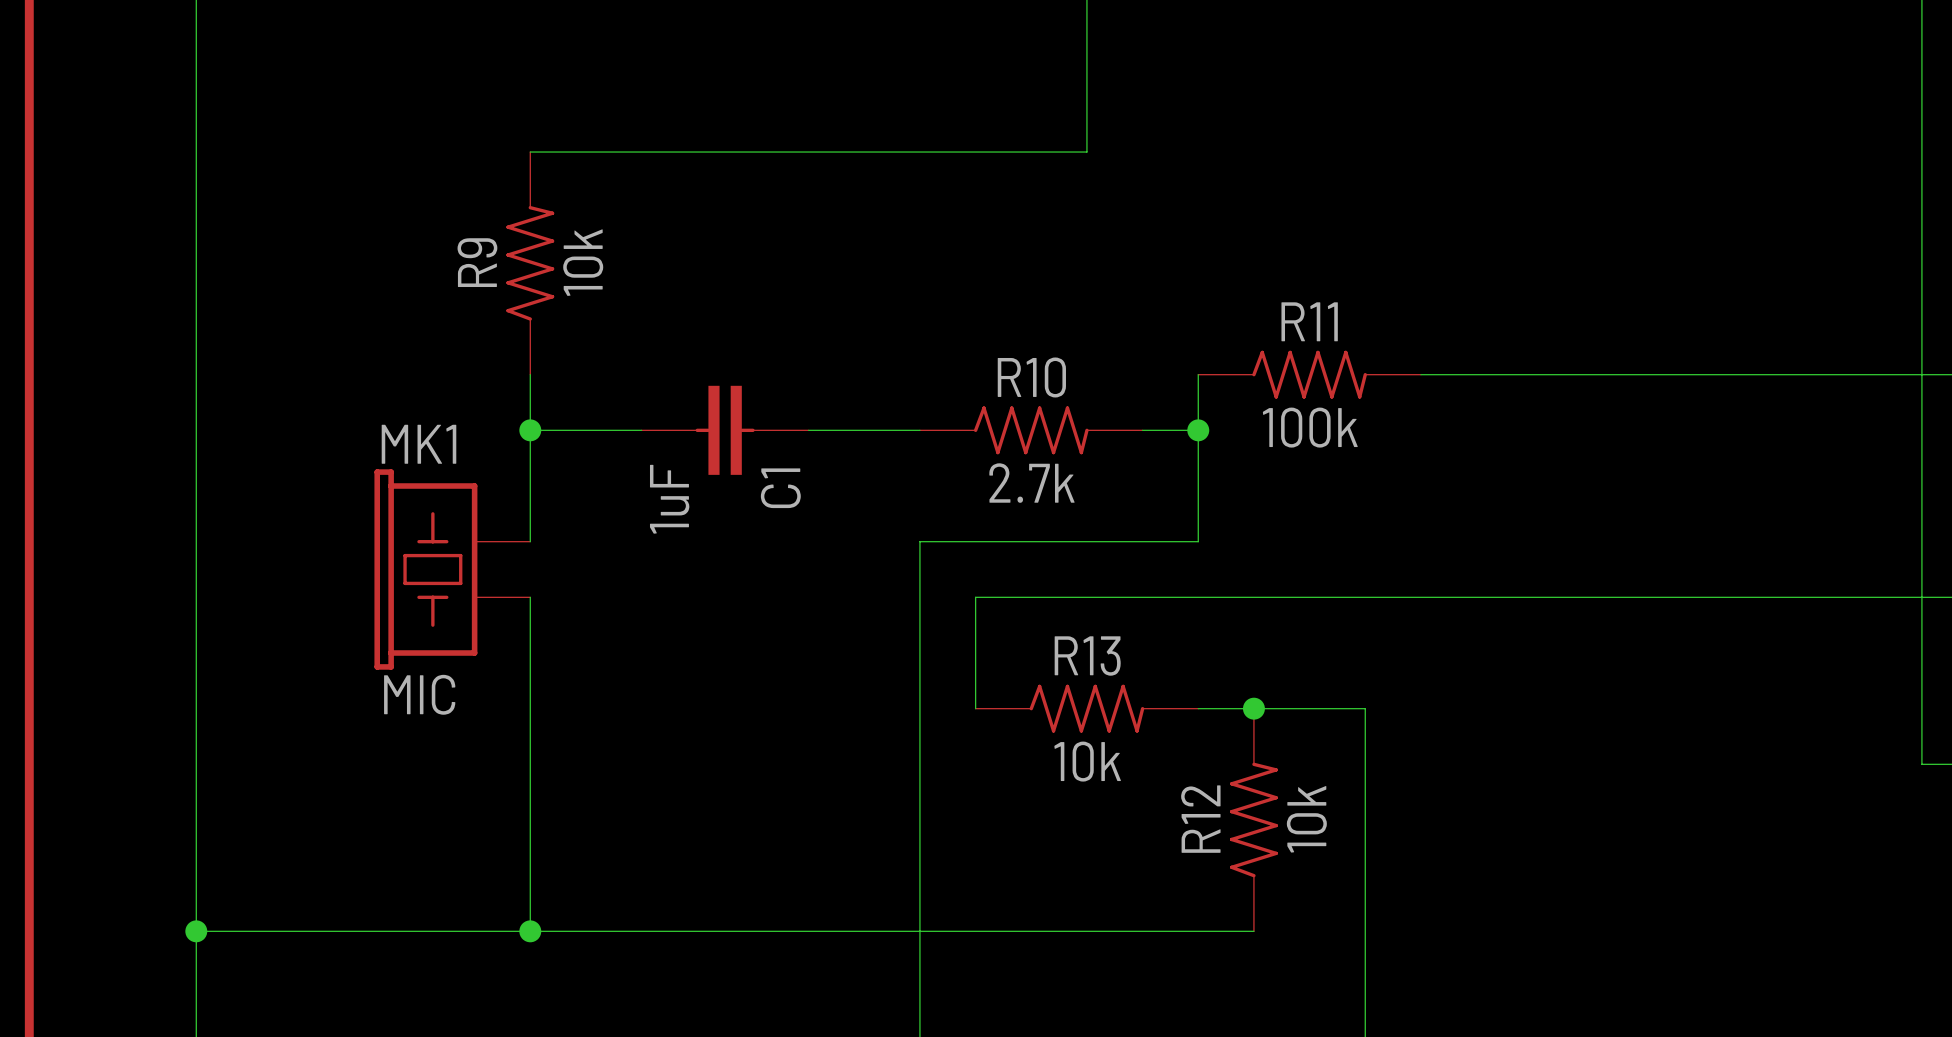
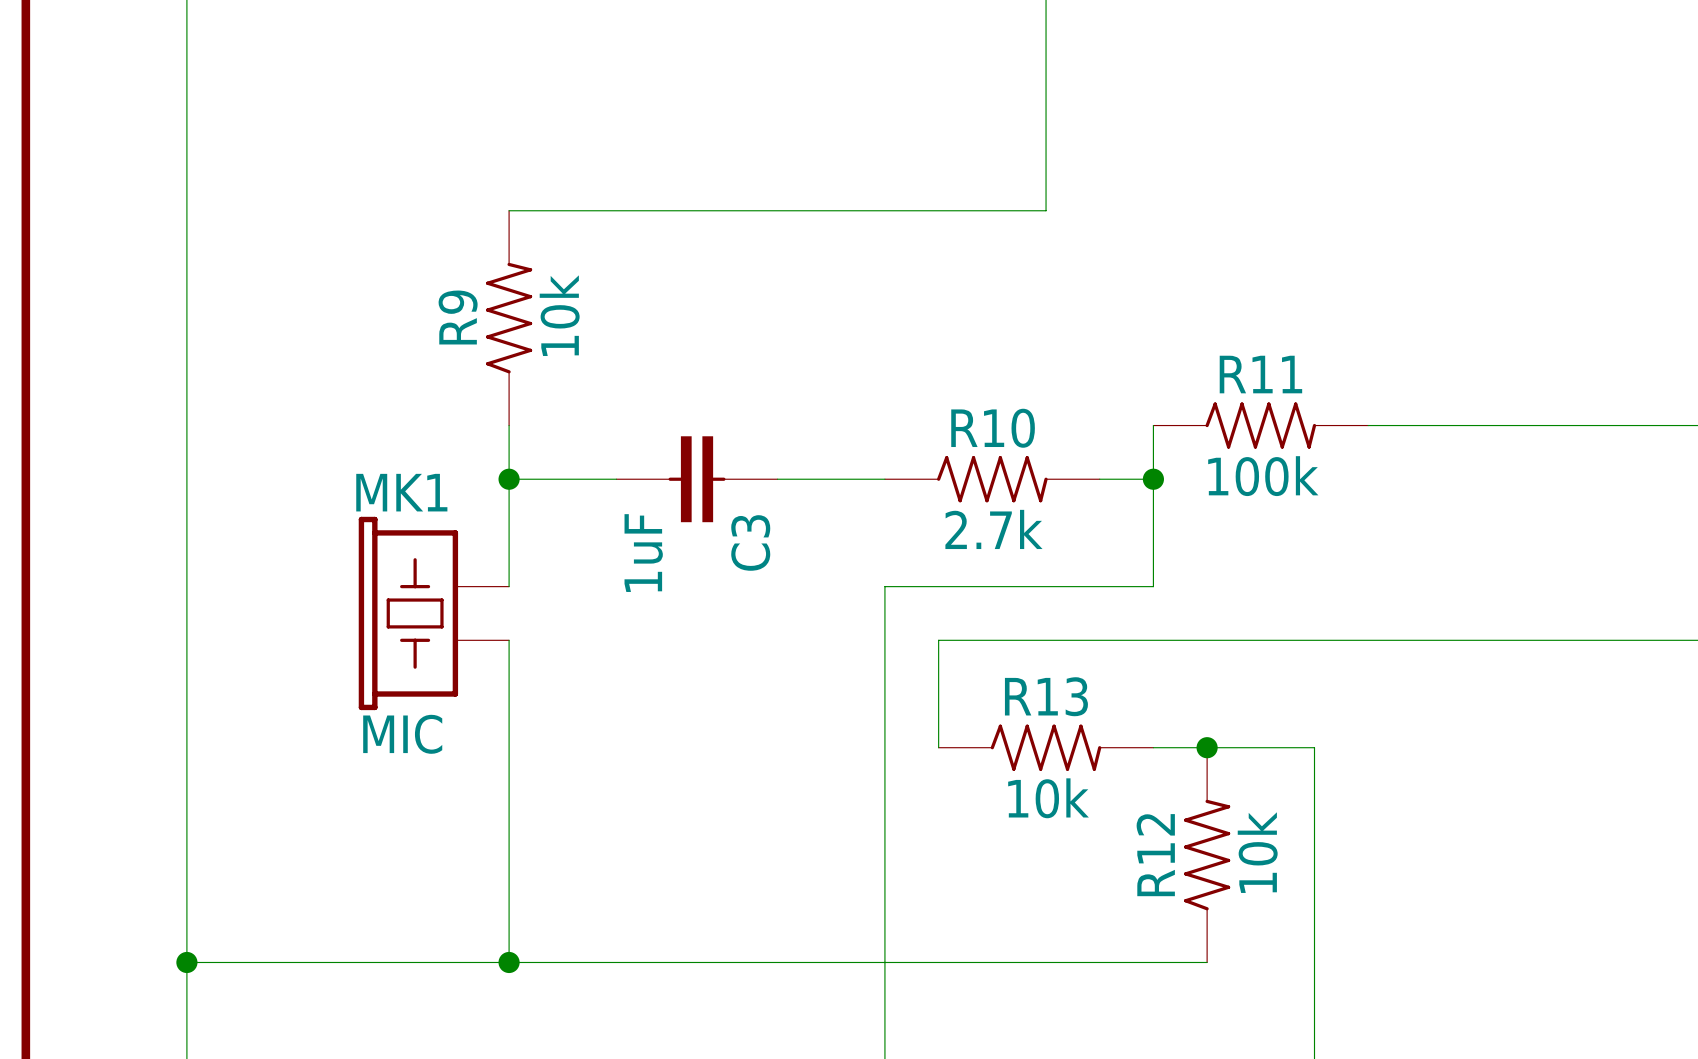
C1 name: C1 (780, 488) -> C3 (750, 542)

